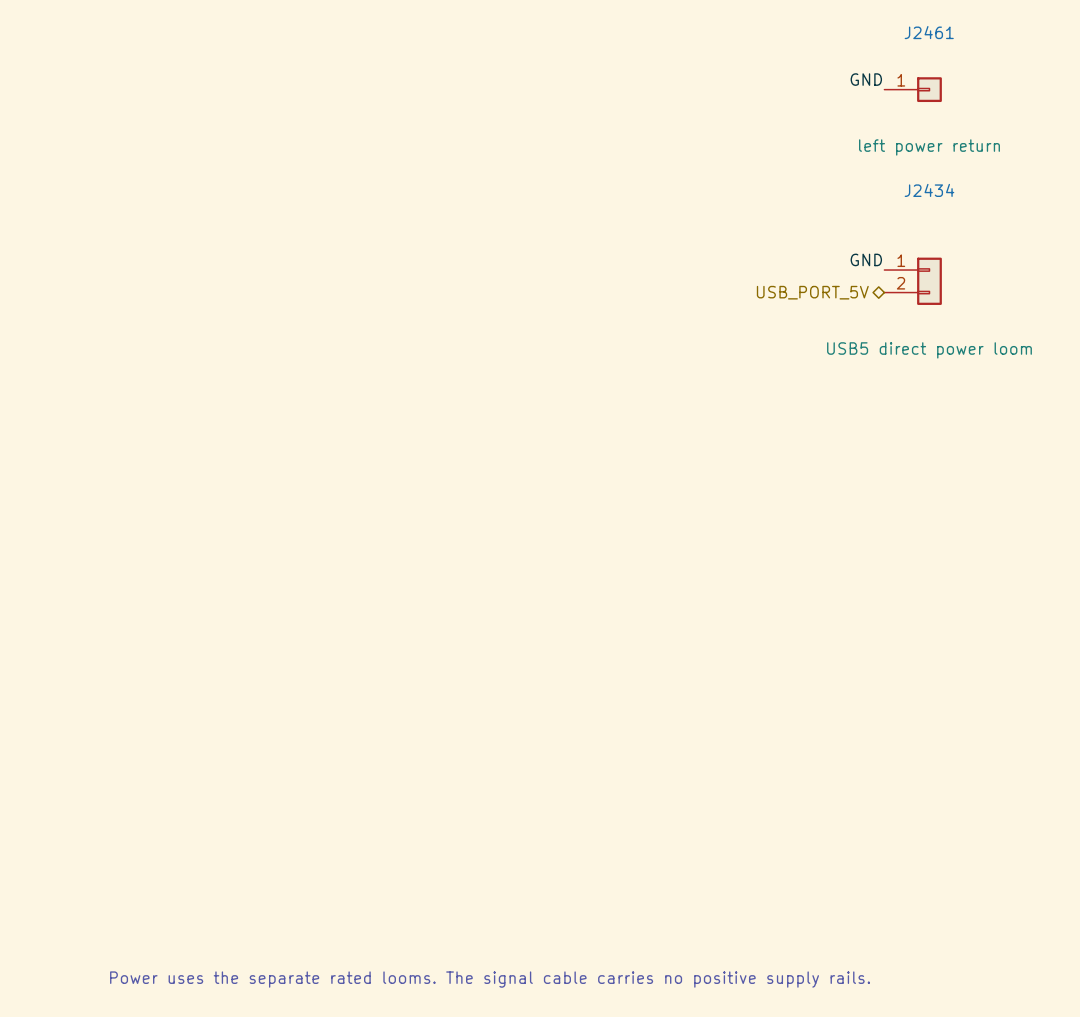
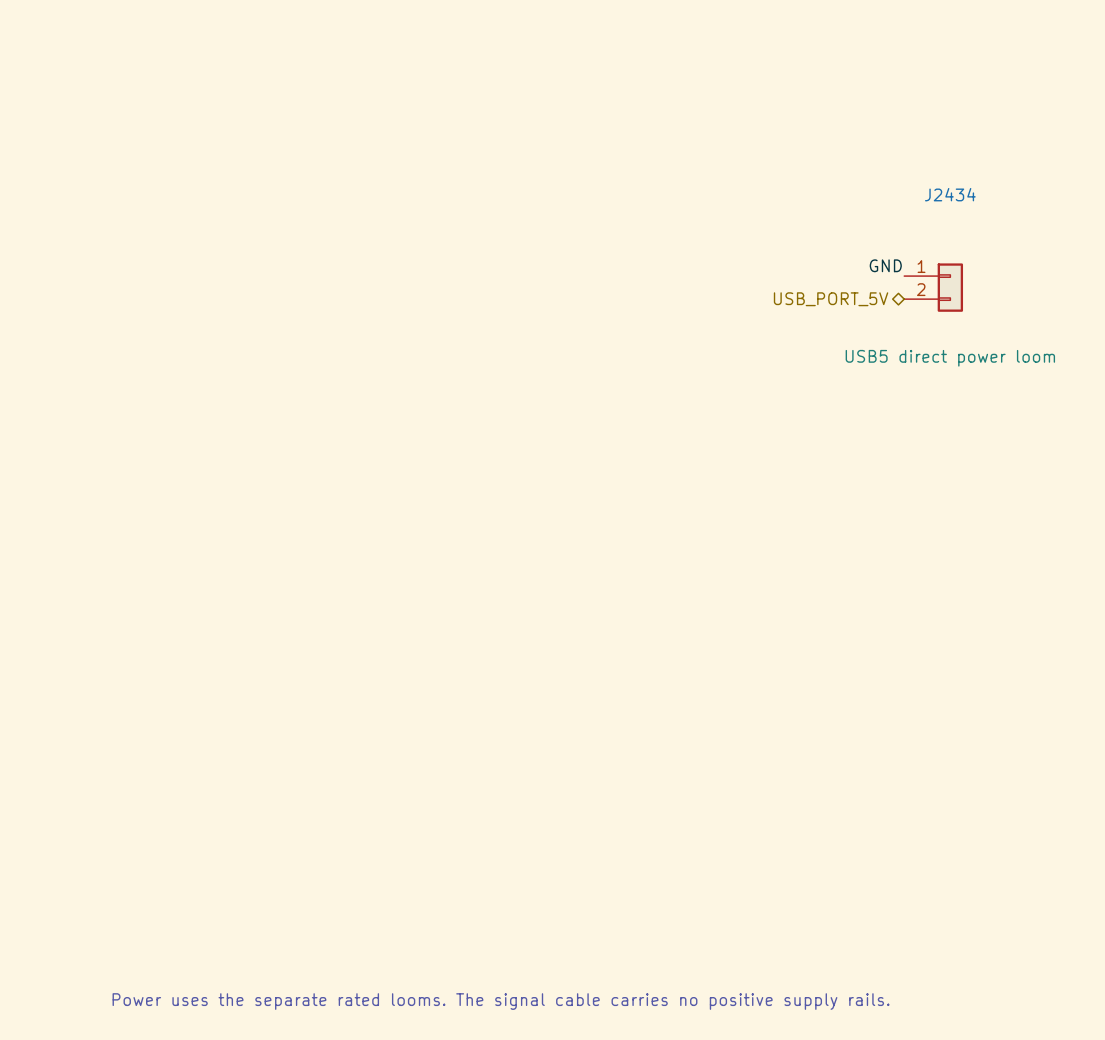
label: GND (866, 79) -> none
J2461: left power return (913, 89) -> none

